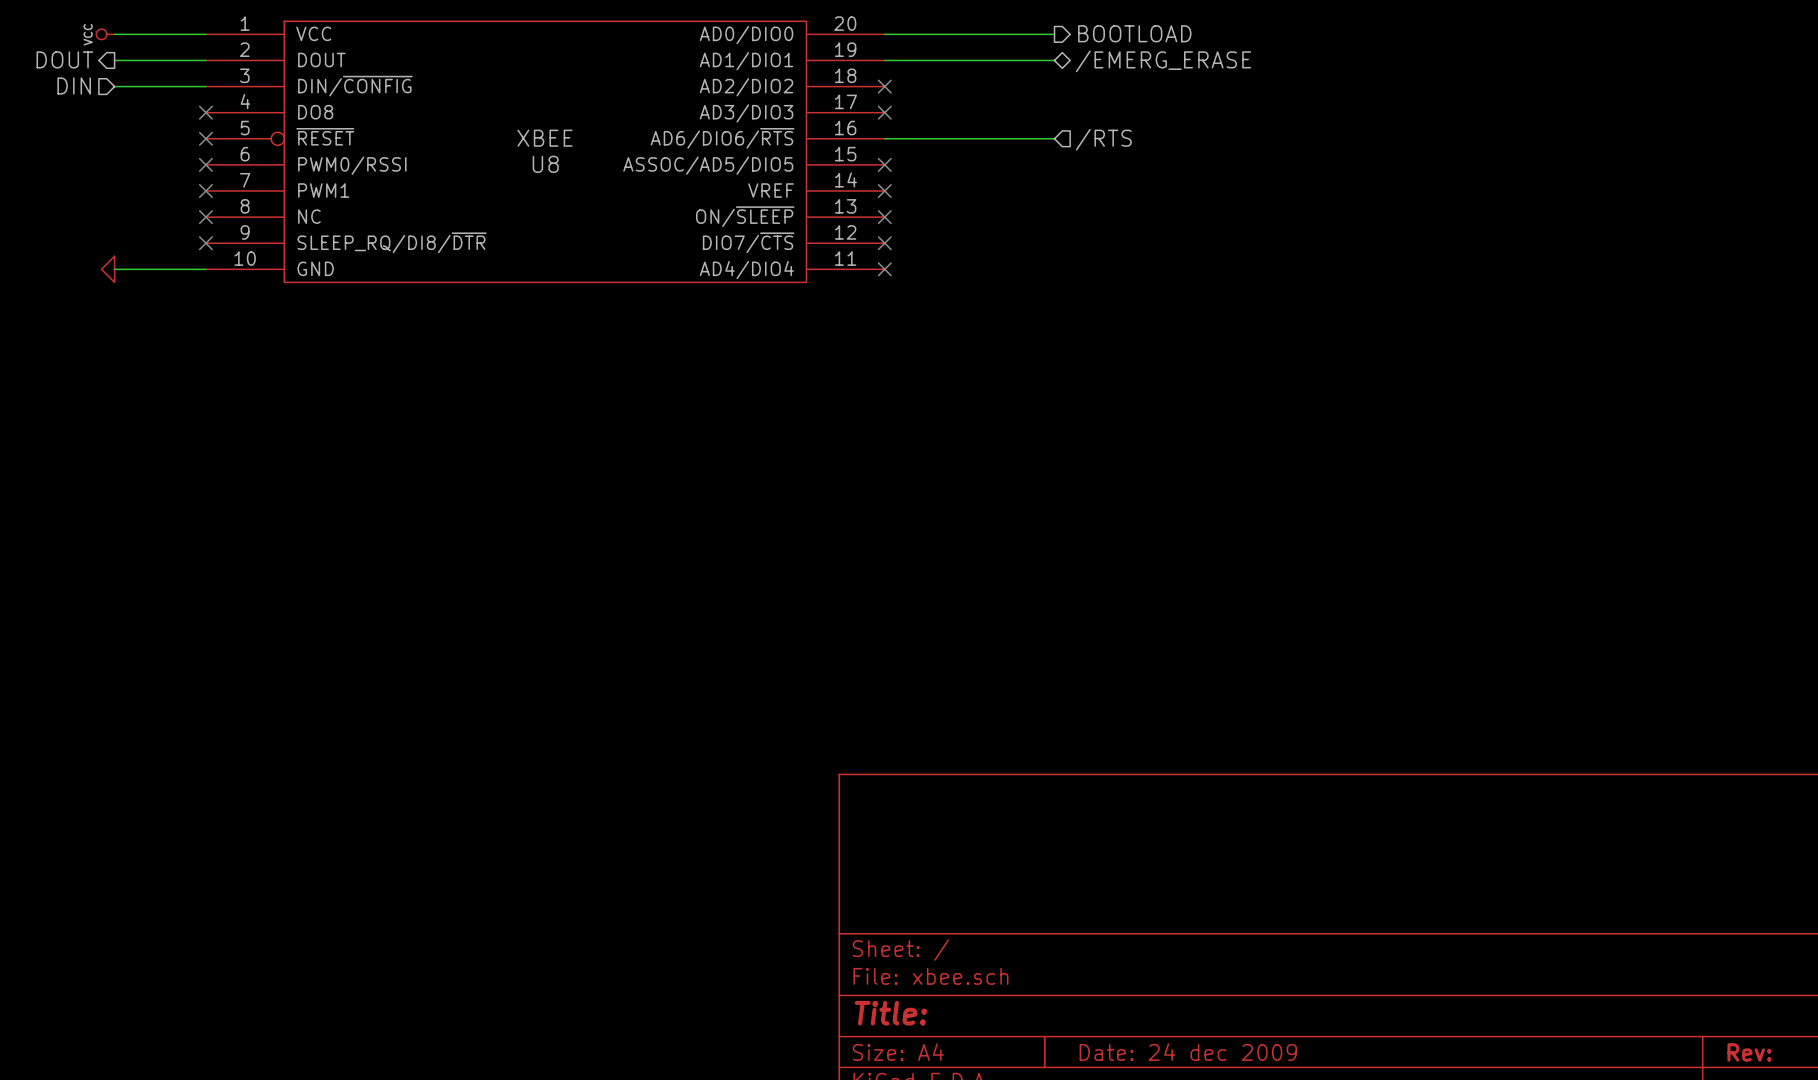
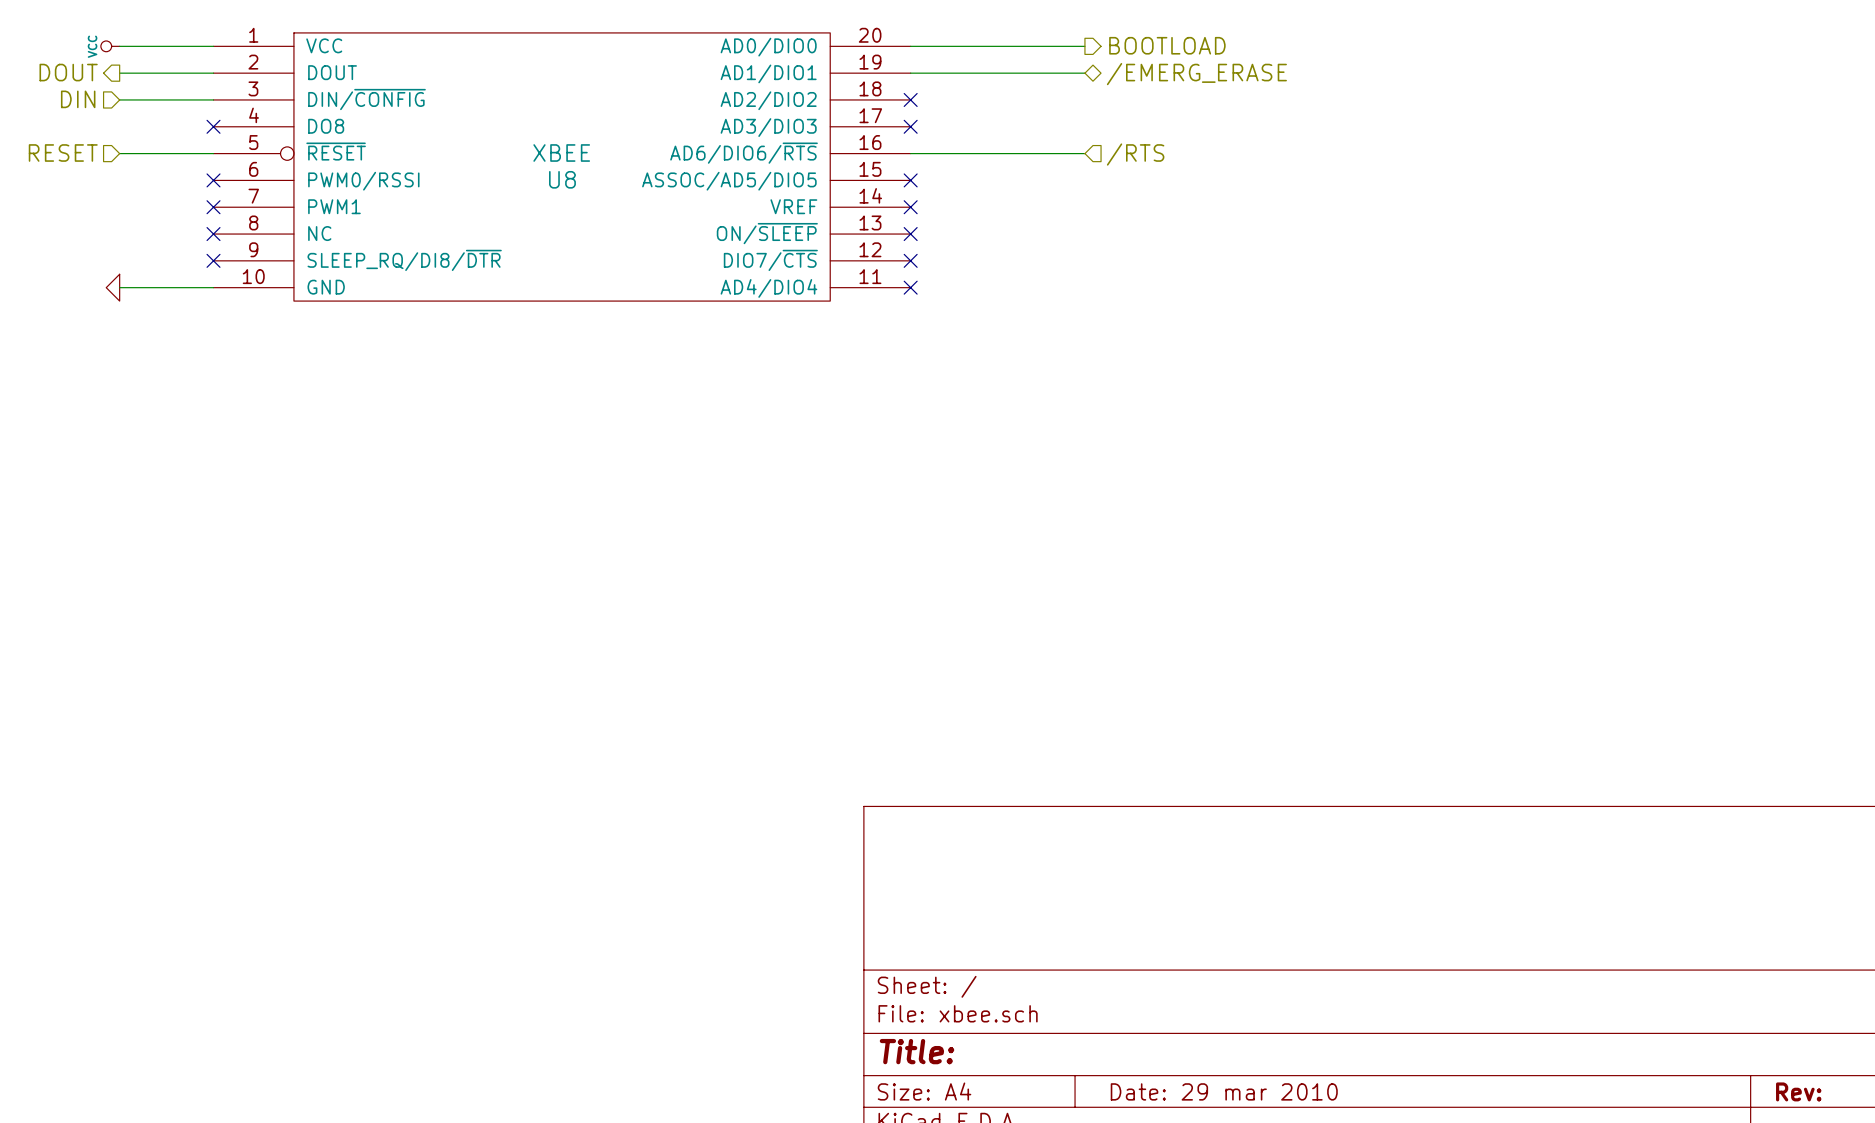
hierarchical label: none -> RESET (63, 152)
wire: none -> (119, 153) (213, 153)
no-connect mark: (205, 138) -> none
title block: Date: 24 dec 2009 (1188, 1052) -> Date: 29 mar 2010 (1224, 1091)

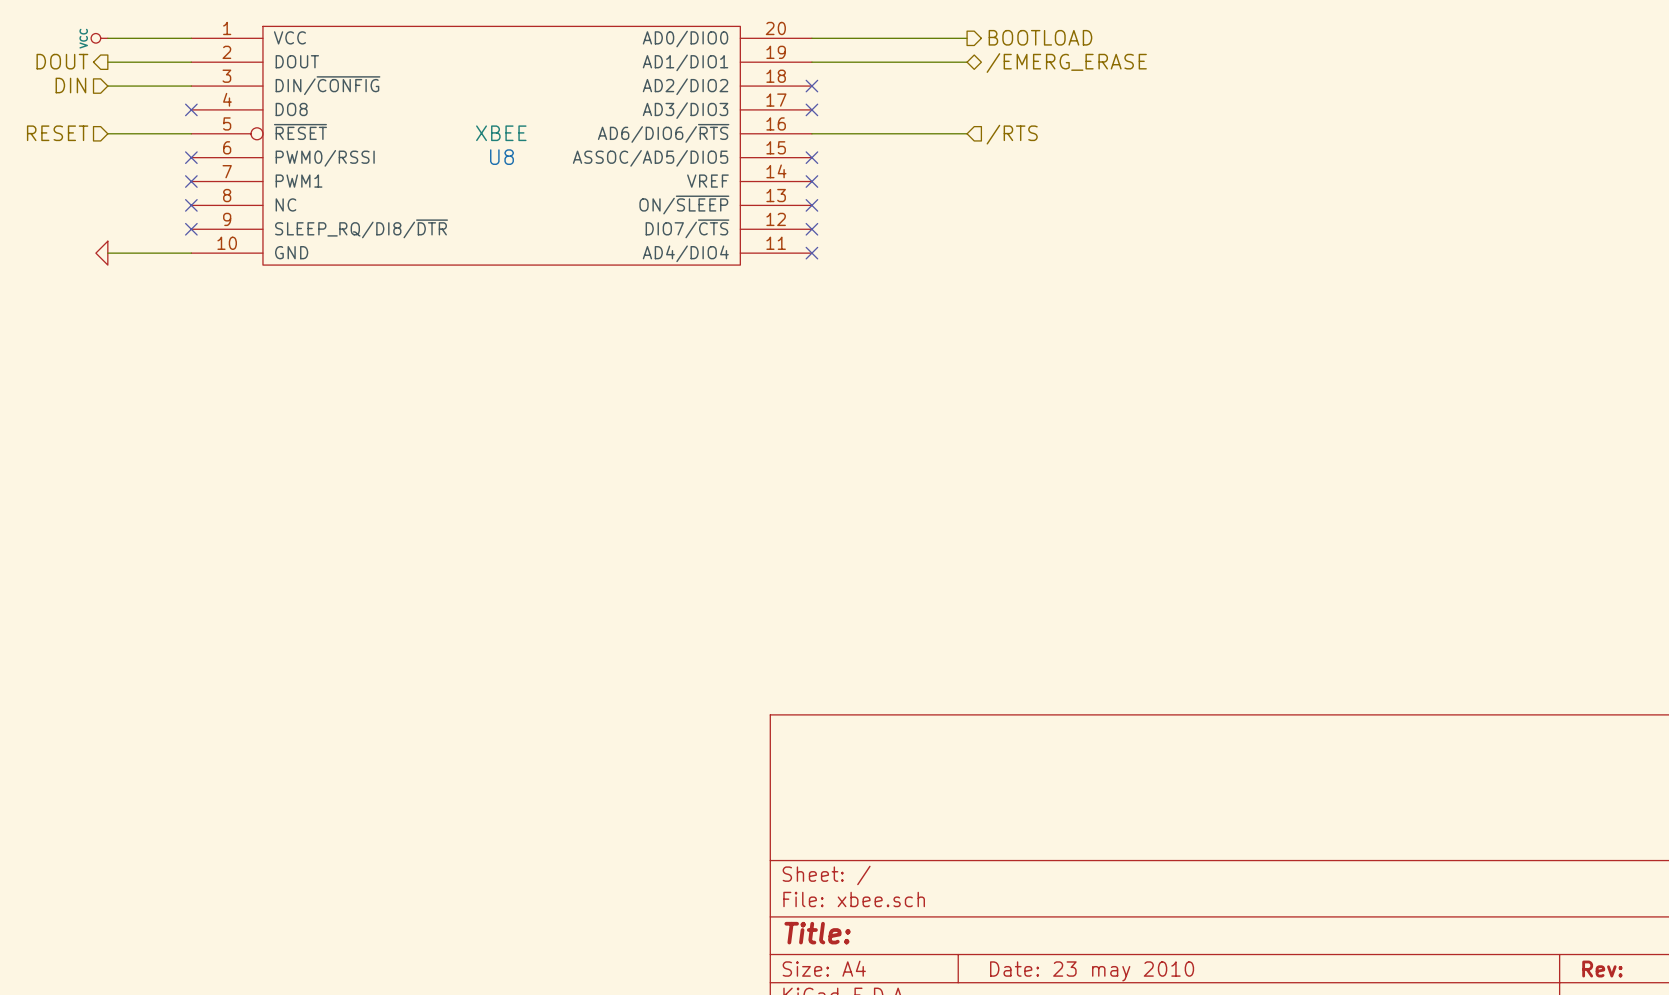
title block: Date: 29 mar 2010 (1224, 1091) -> Date: 23 may 2010 (1092, 971)

